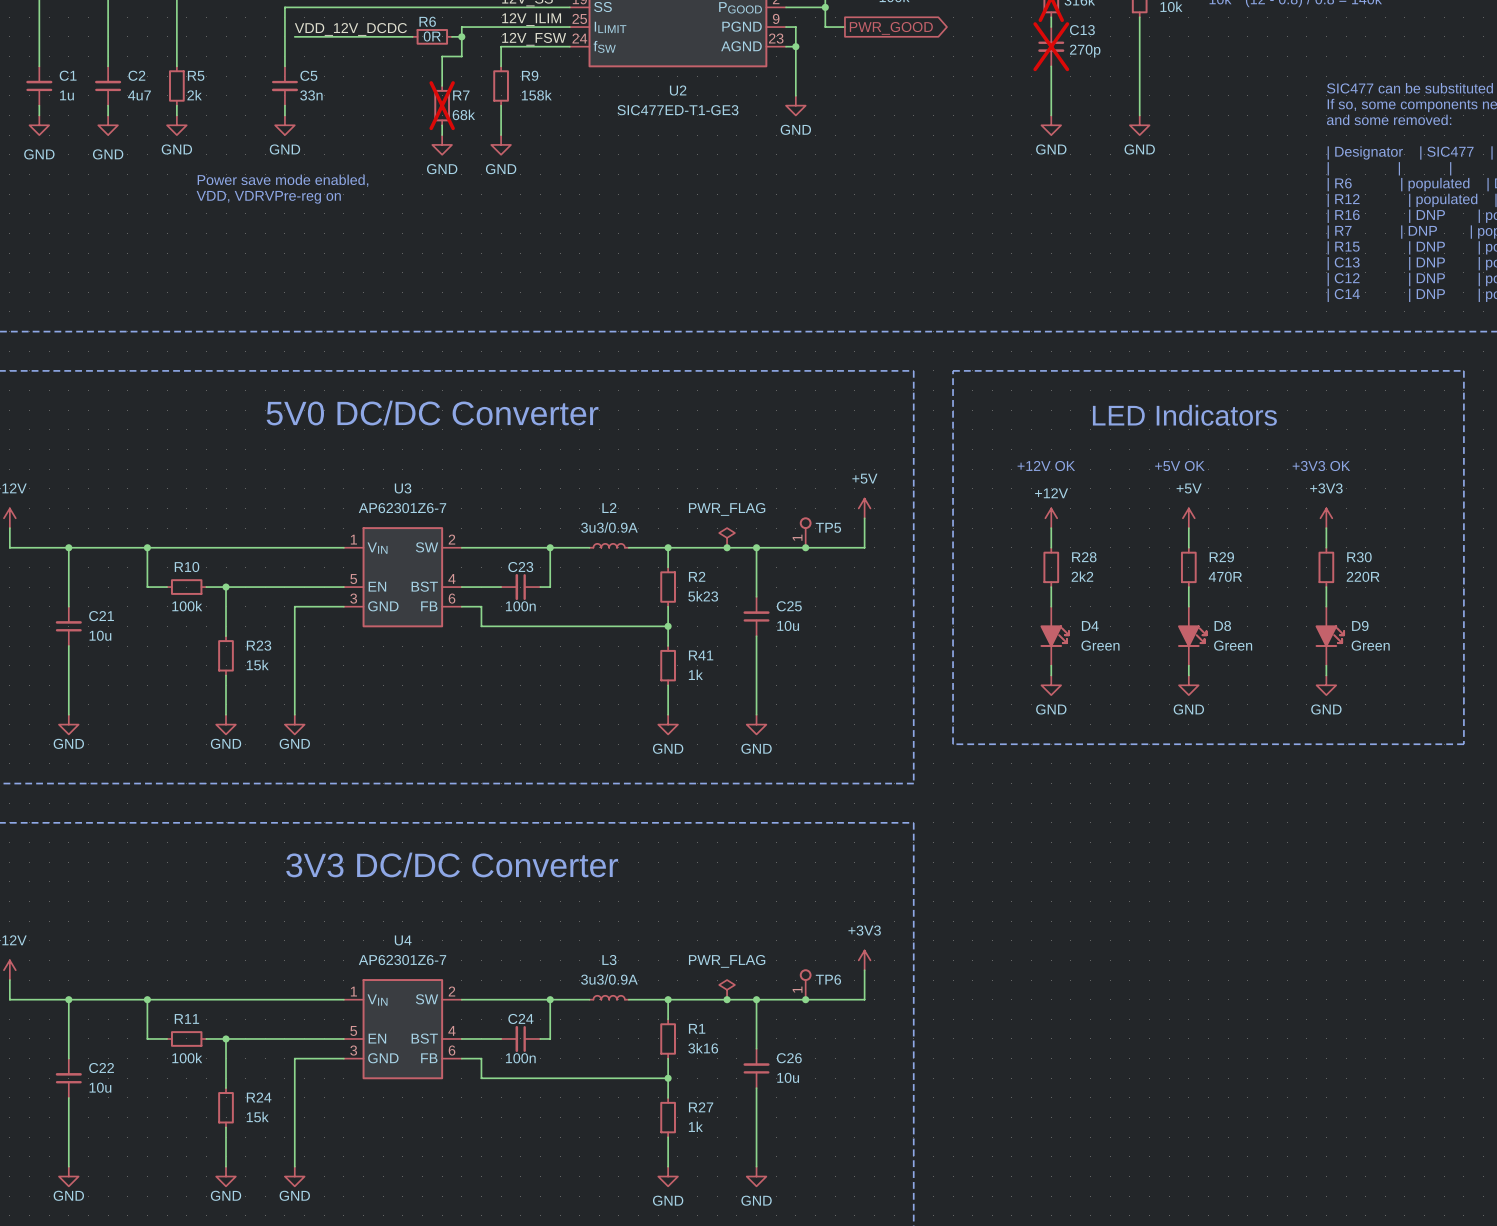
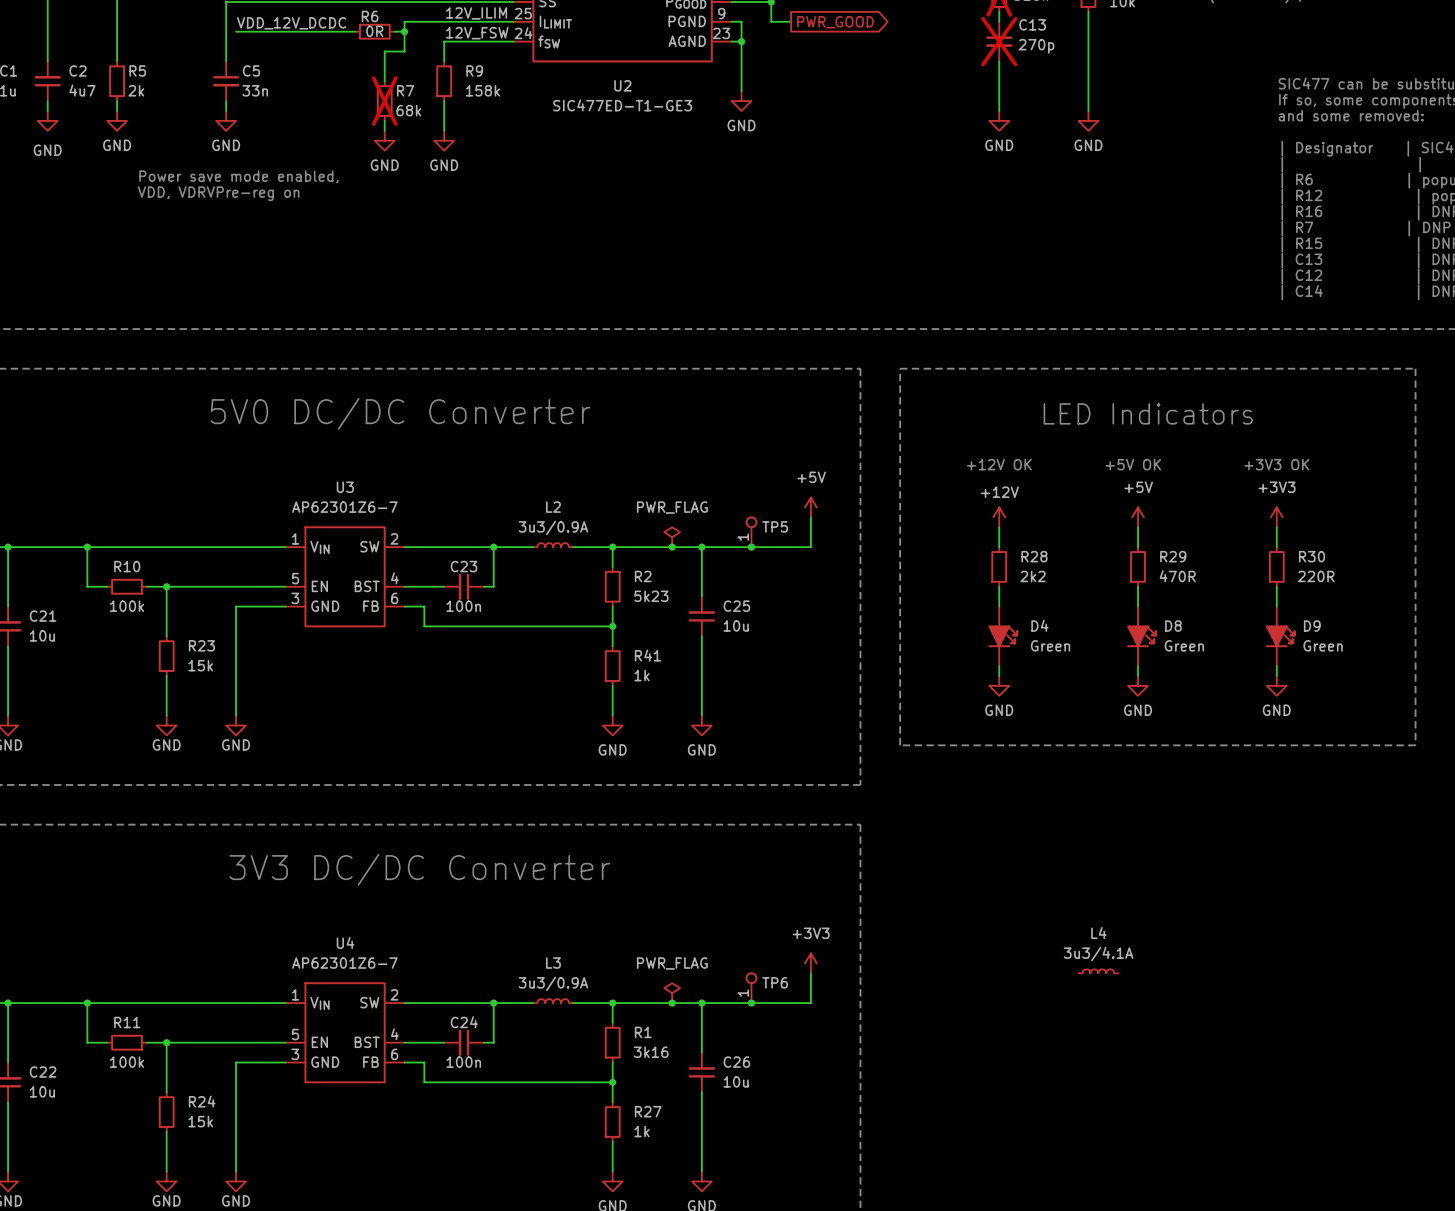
L4: none -> (1098, 971)

